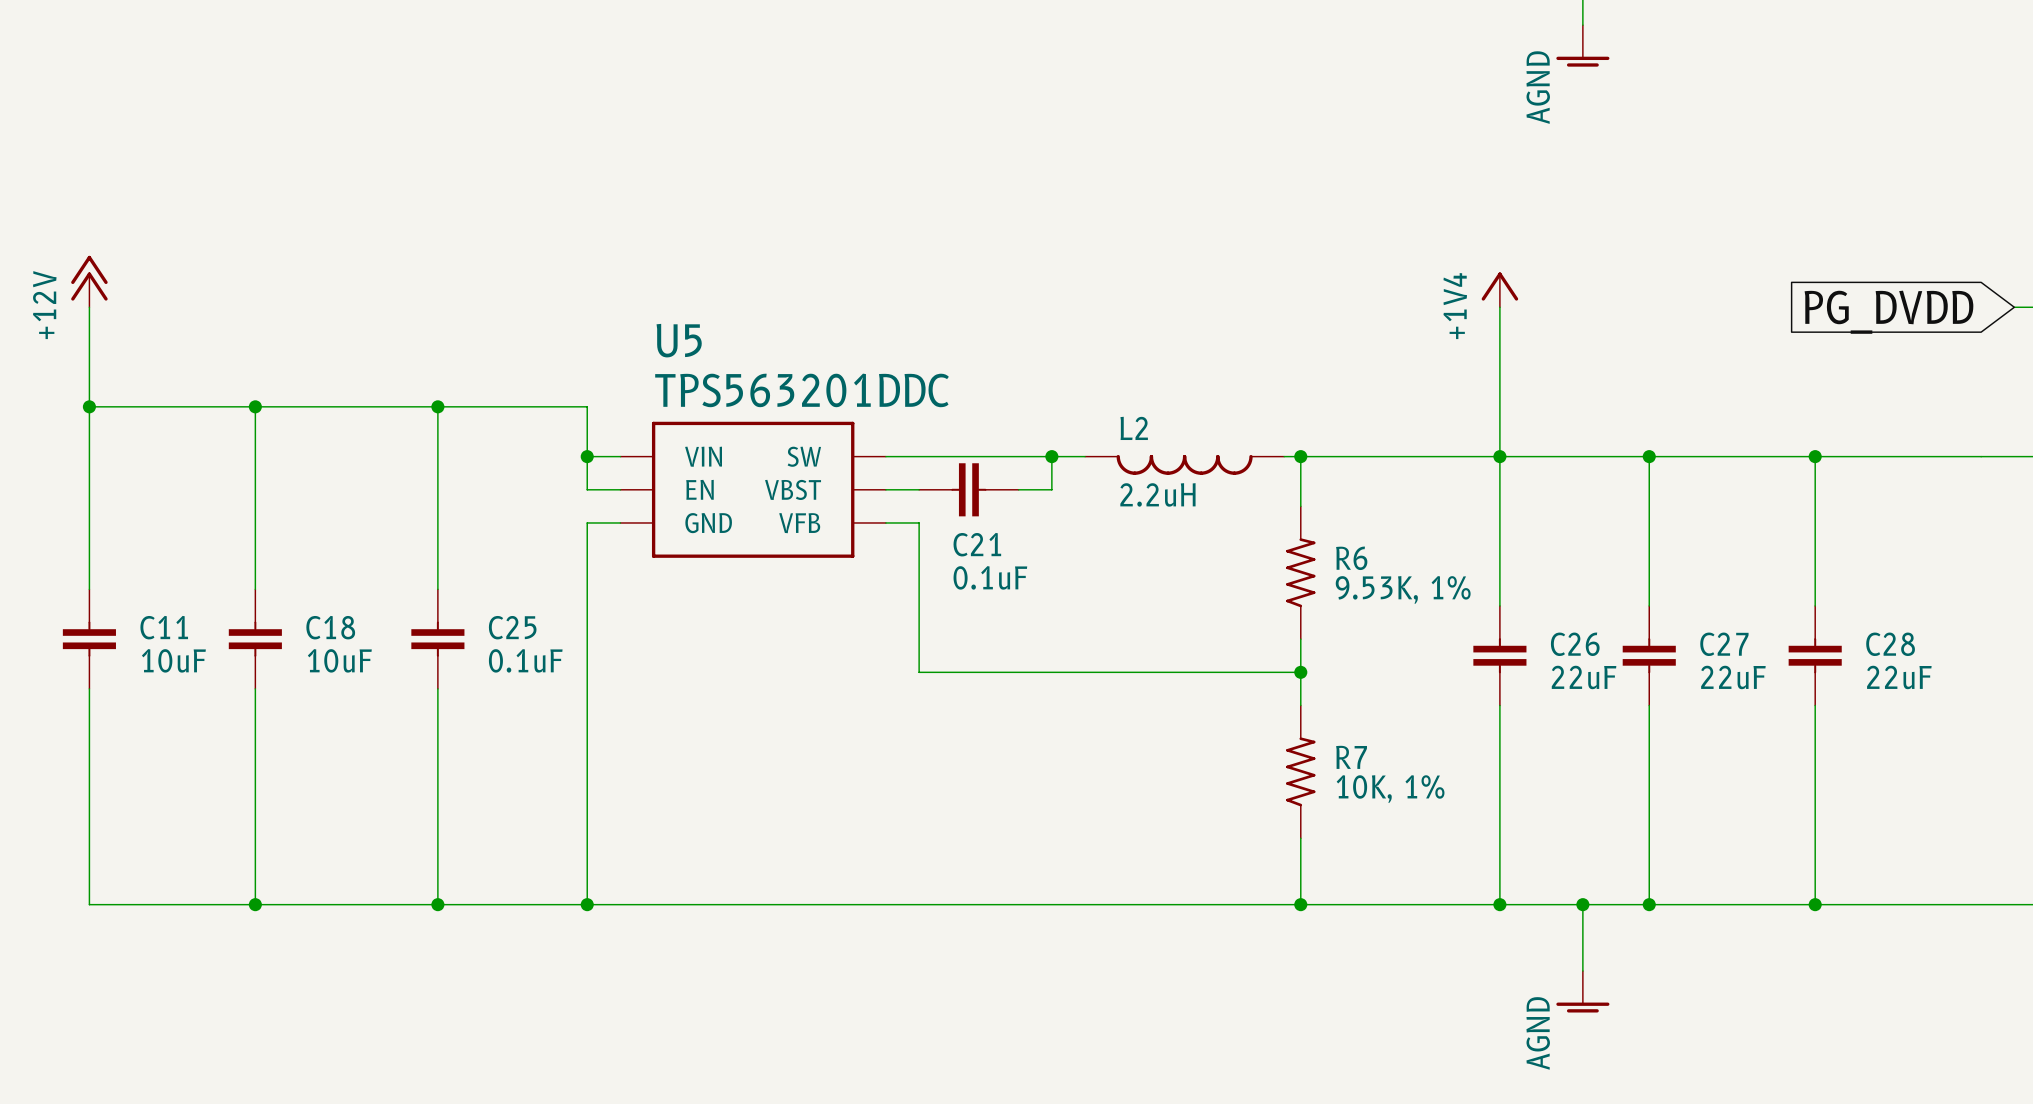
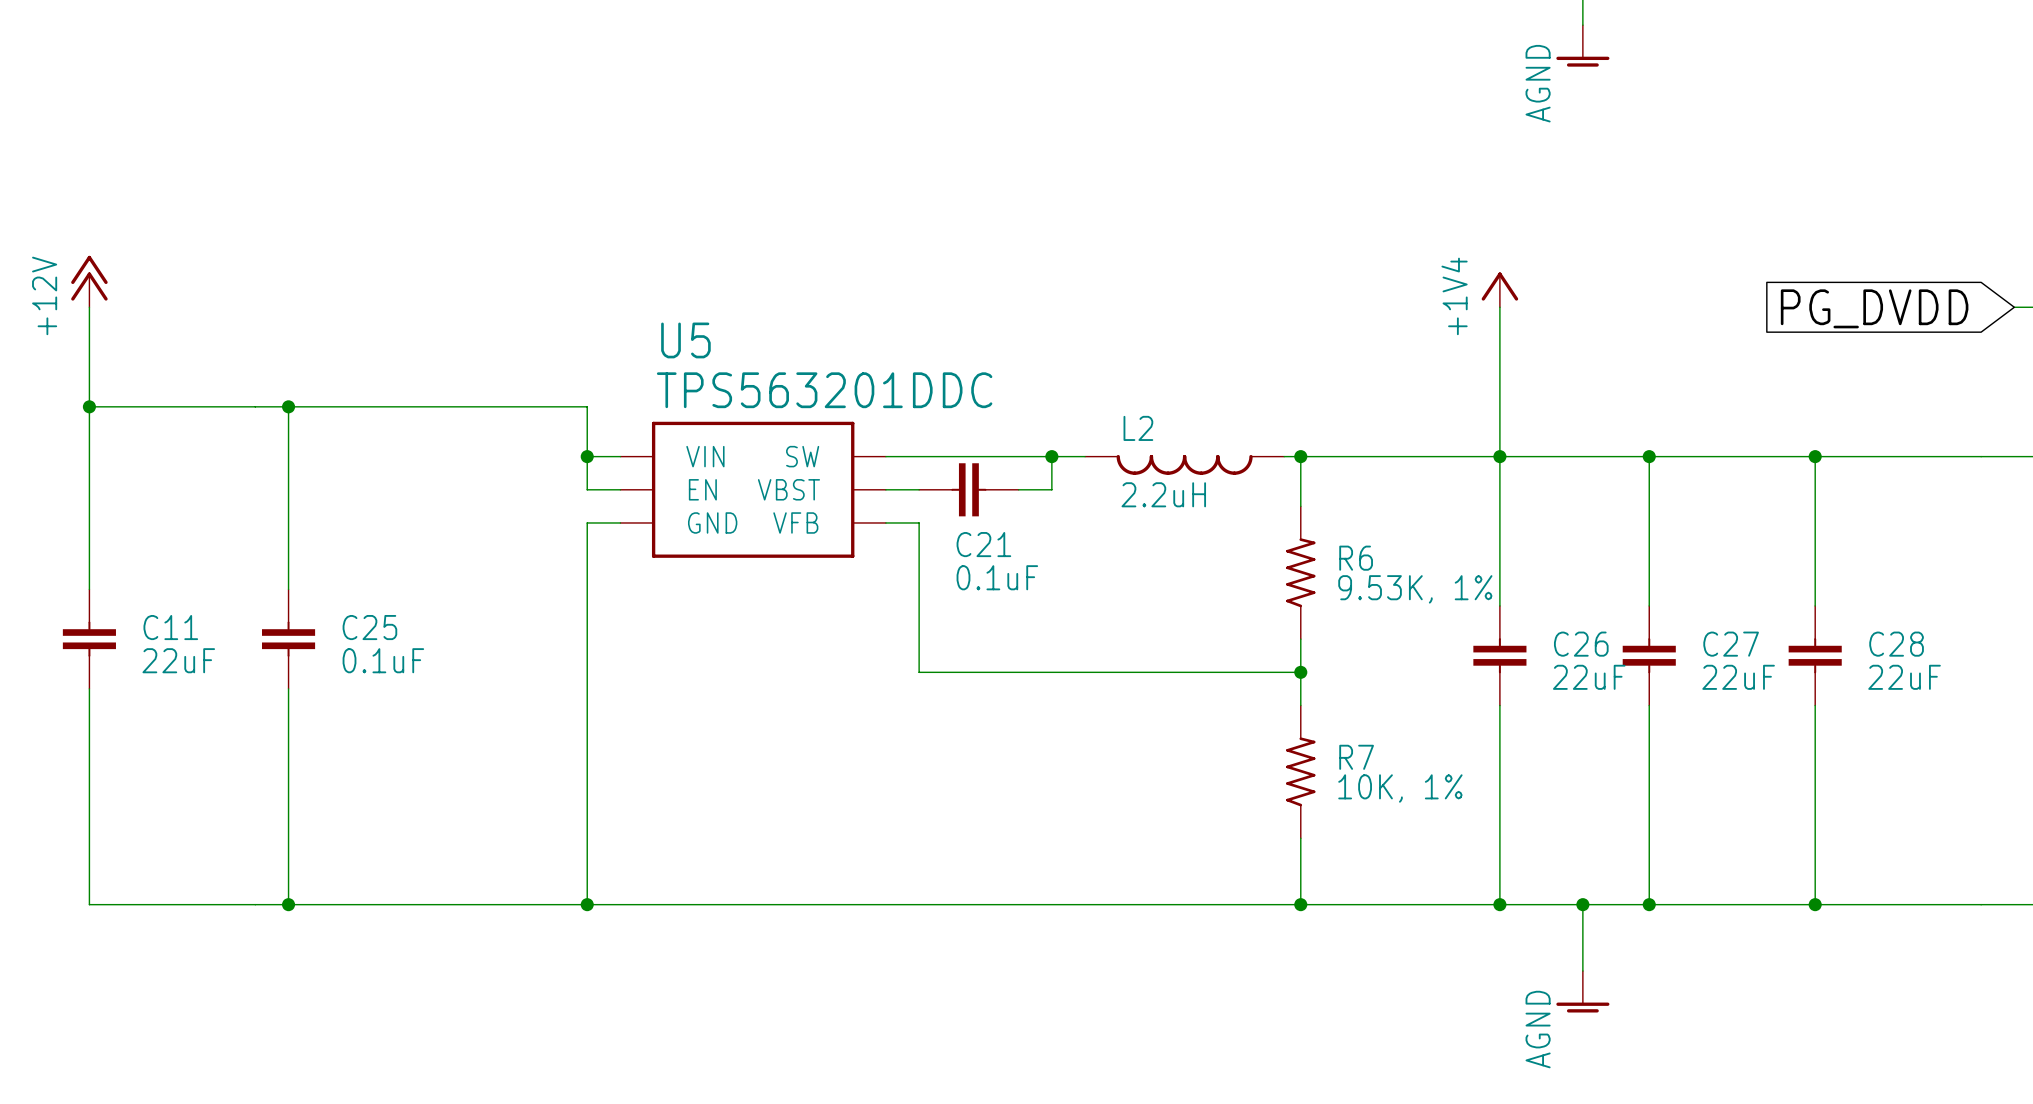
wire: (255, 406) (255, 589) -> (288, 406) (288, 589)
junction position: (255, 406) -> (288, 406)
wire: (437, 406) (437, 589) -> none
junction: (437, 406) -> none
C18: 10uF (255, 639) -> none
C25 position: (437, 639) -> (288, 639)
C11 value: 10uF (173, 660) -> 22uF (178, 660)
wire: (255, 688) (255, 904) -> (288, 688) (288, 904)
wire: (437, 688) (437, 904) -> none
junction position: (255, 904) -> (288, 904)
junction: (437, 904) -> none

